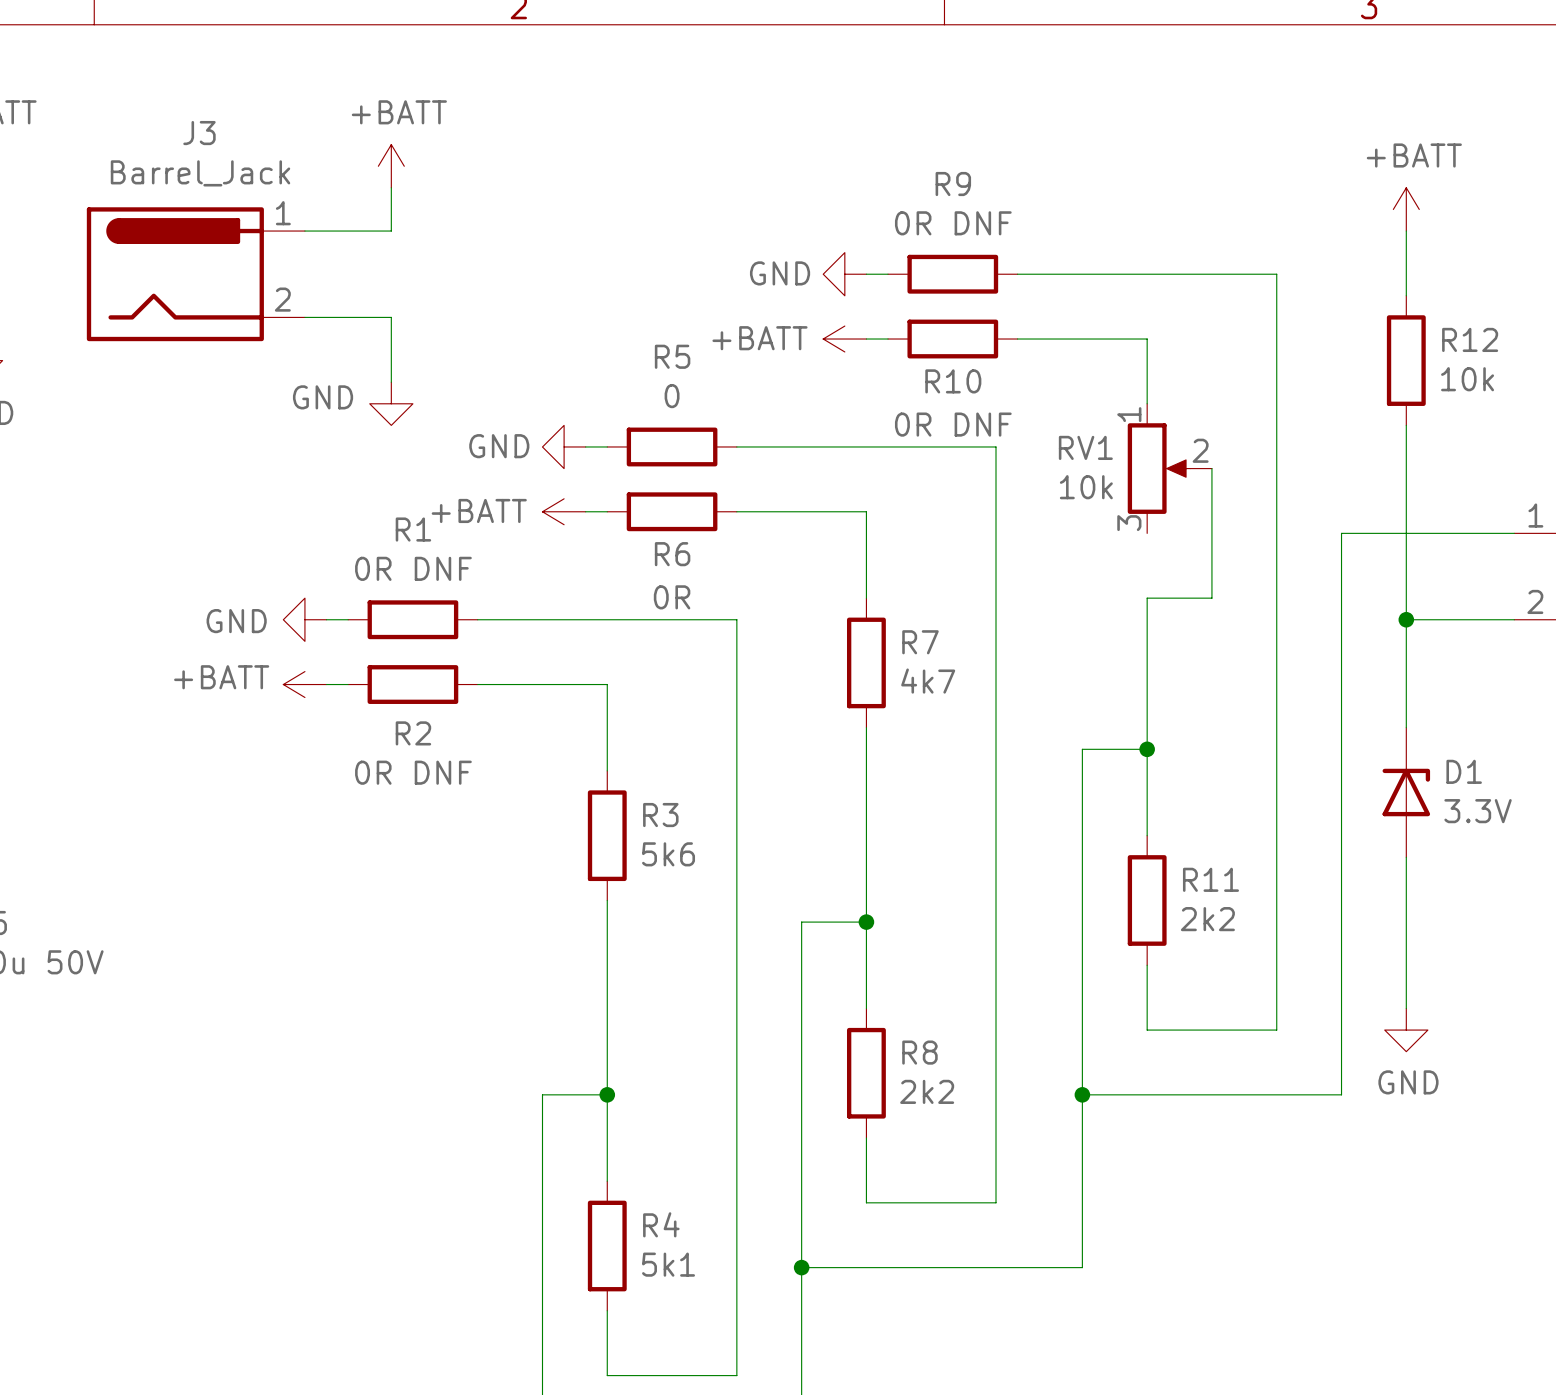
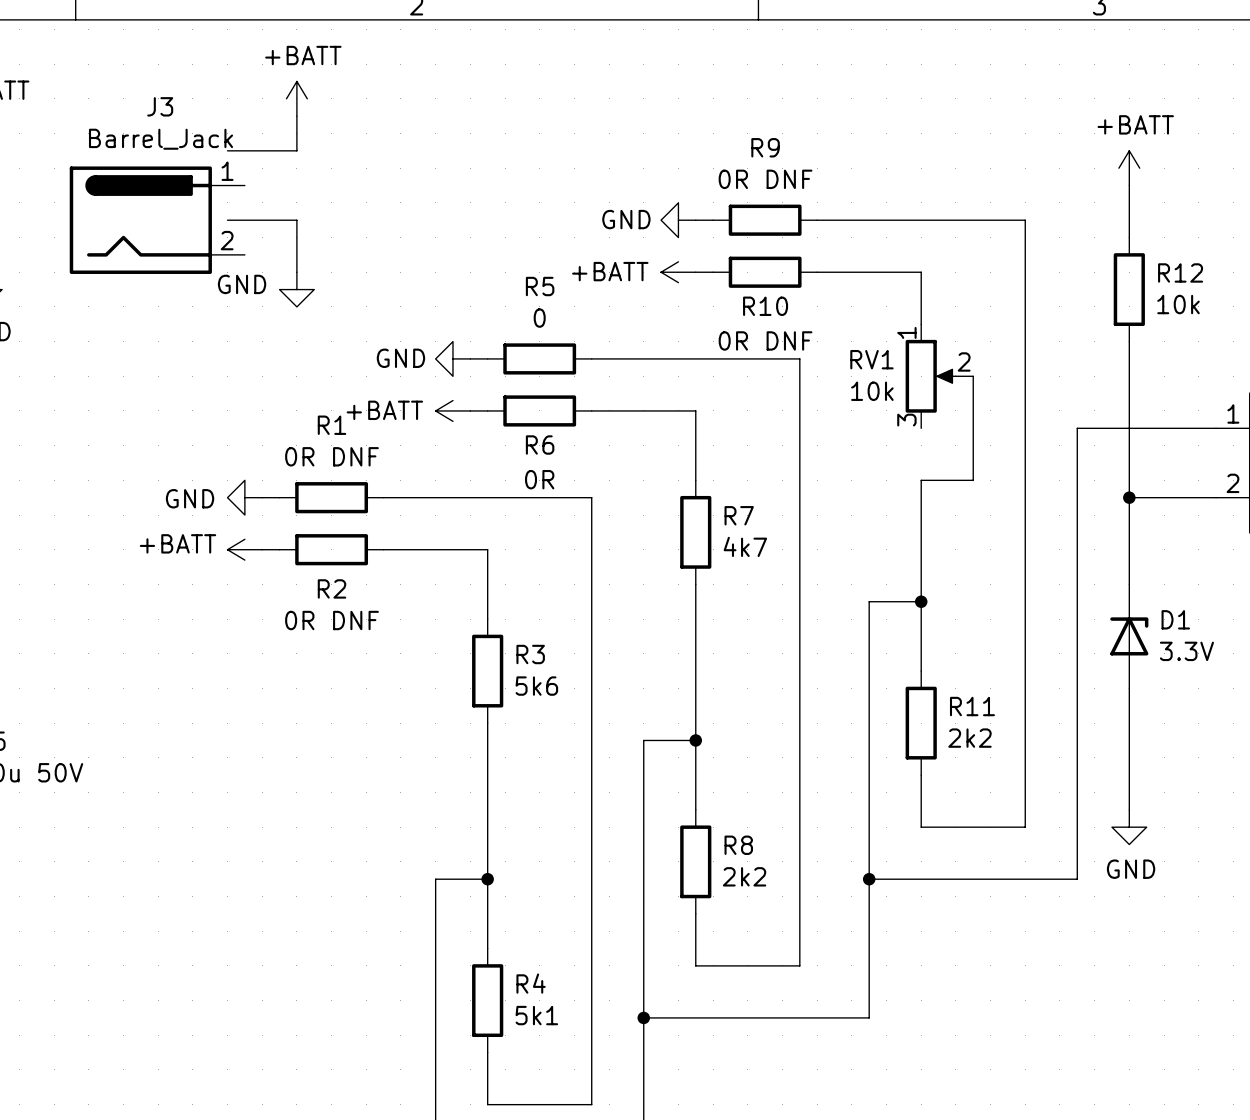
power symbol position: +BATT (391, 166) -> +BATT (296, 98)
wire: (391, 187) (391, 231) (304, 231) -> (296, 116) (296, 150) (227, 150)
wire: (304, 317) (391, 317) (391, 382) -> (227, 220) (296, 220) (296, 272)
power symbol position: GND (391, 403) -> GND (296, 289)

